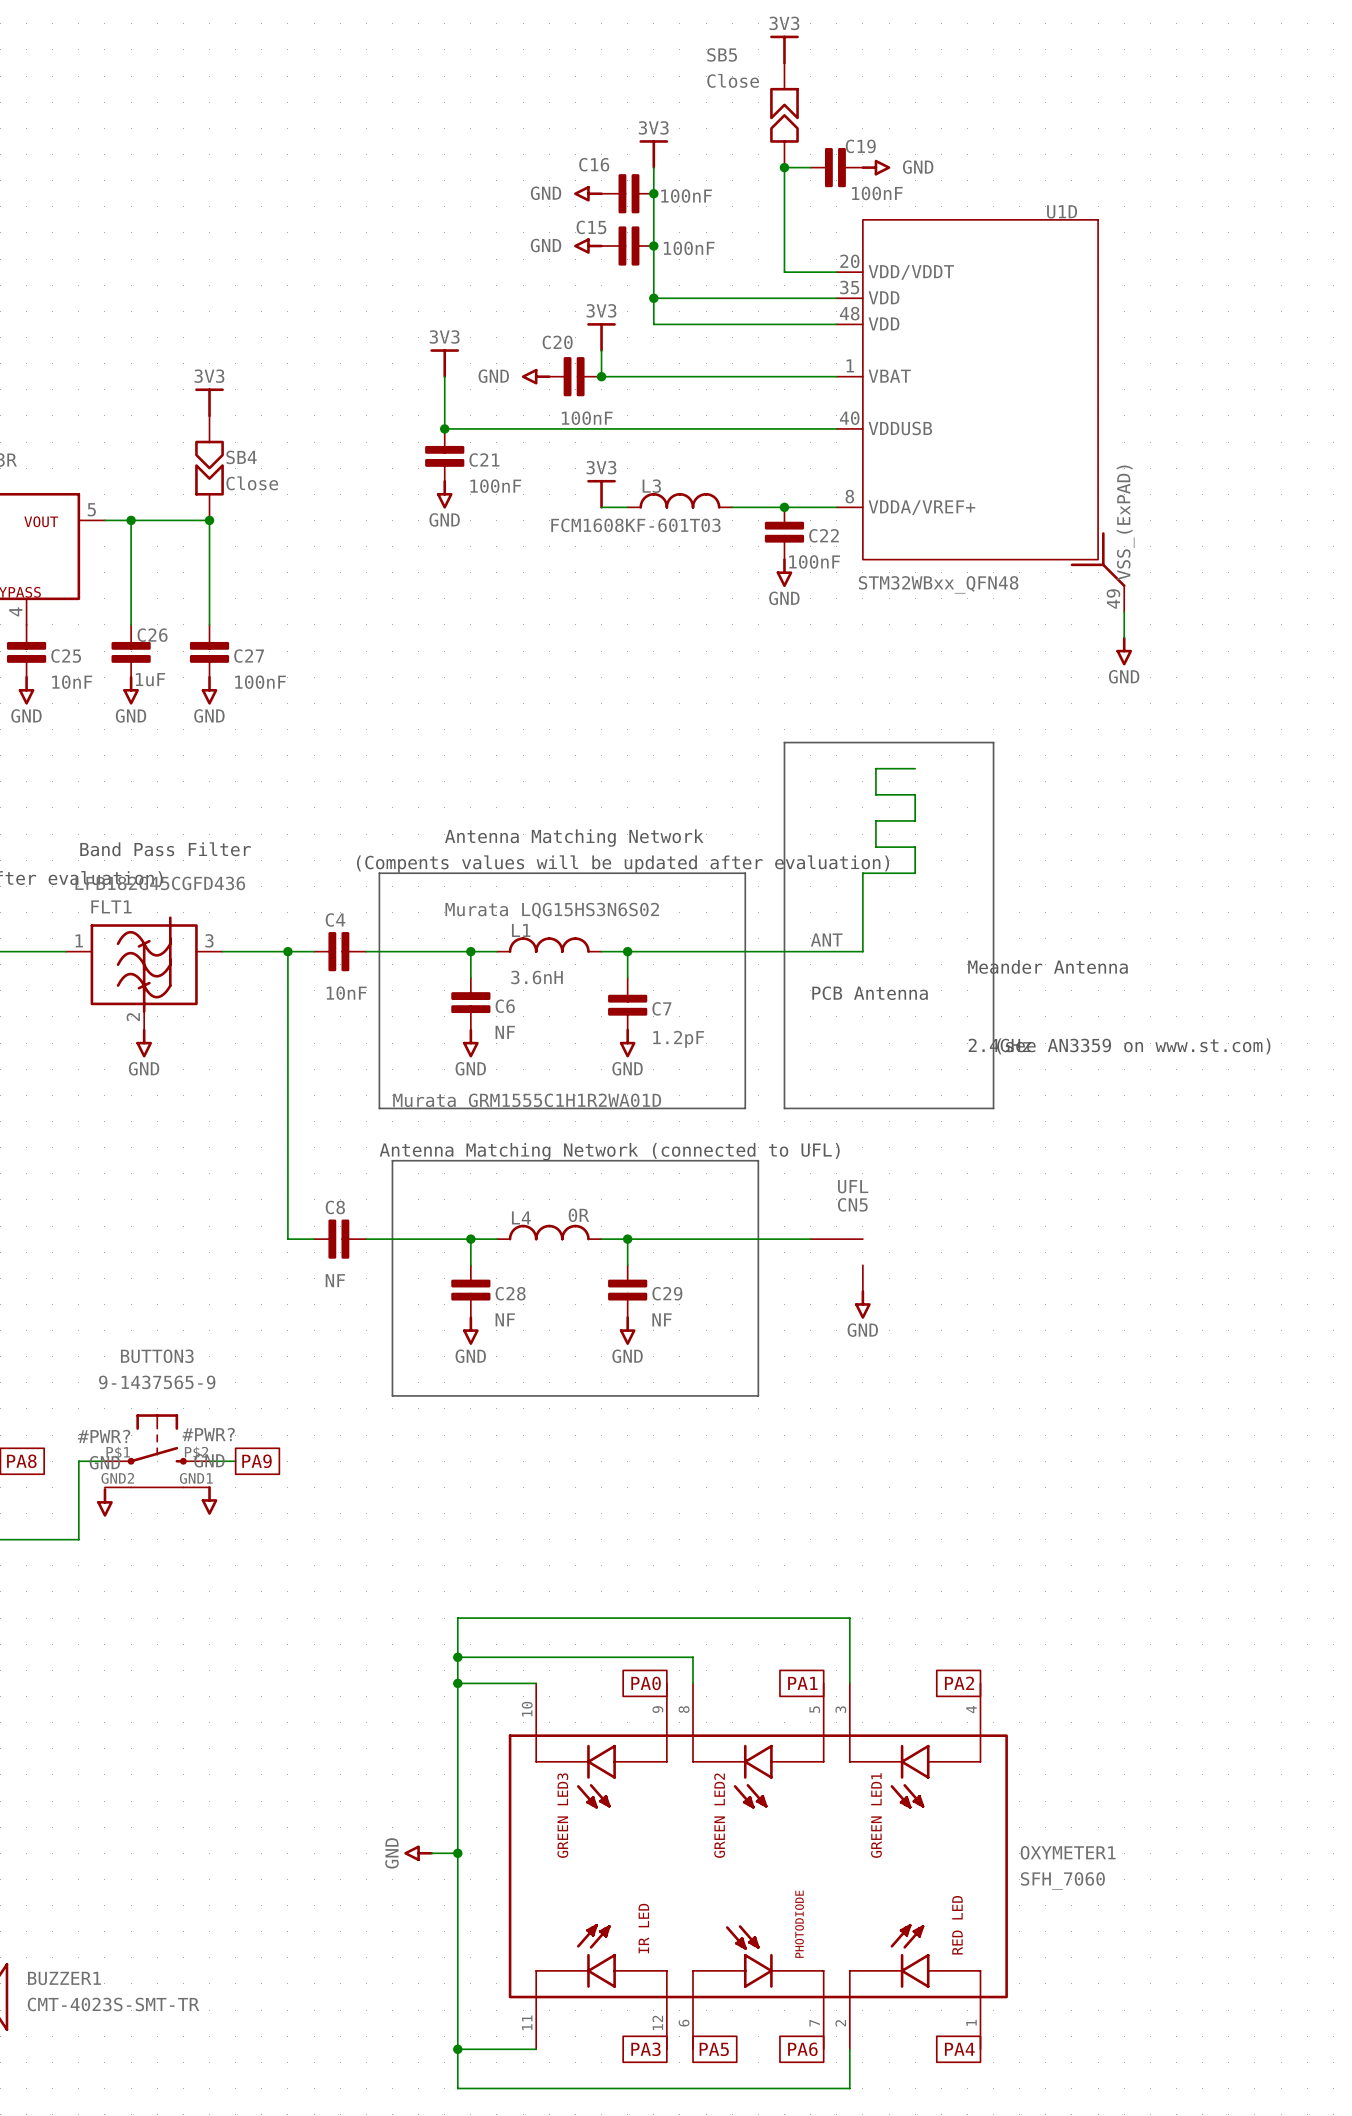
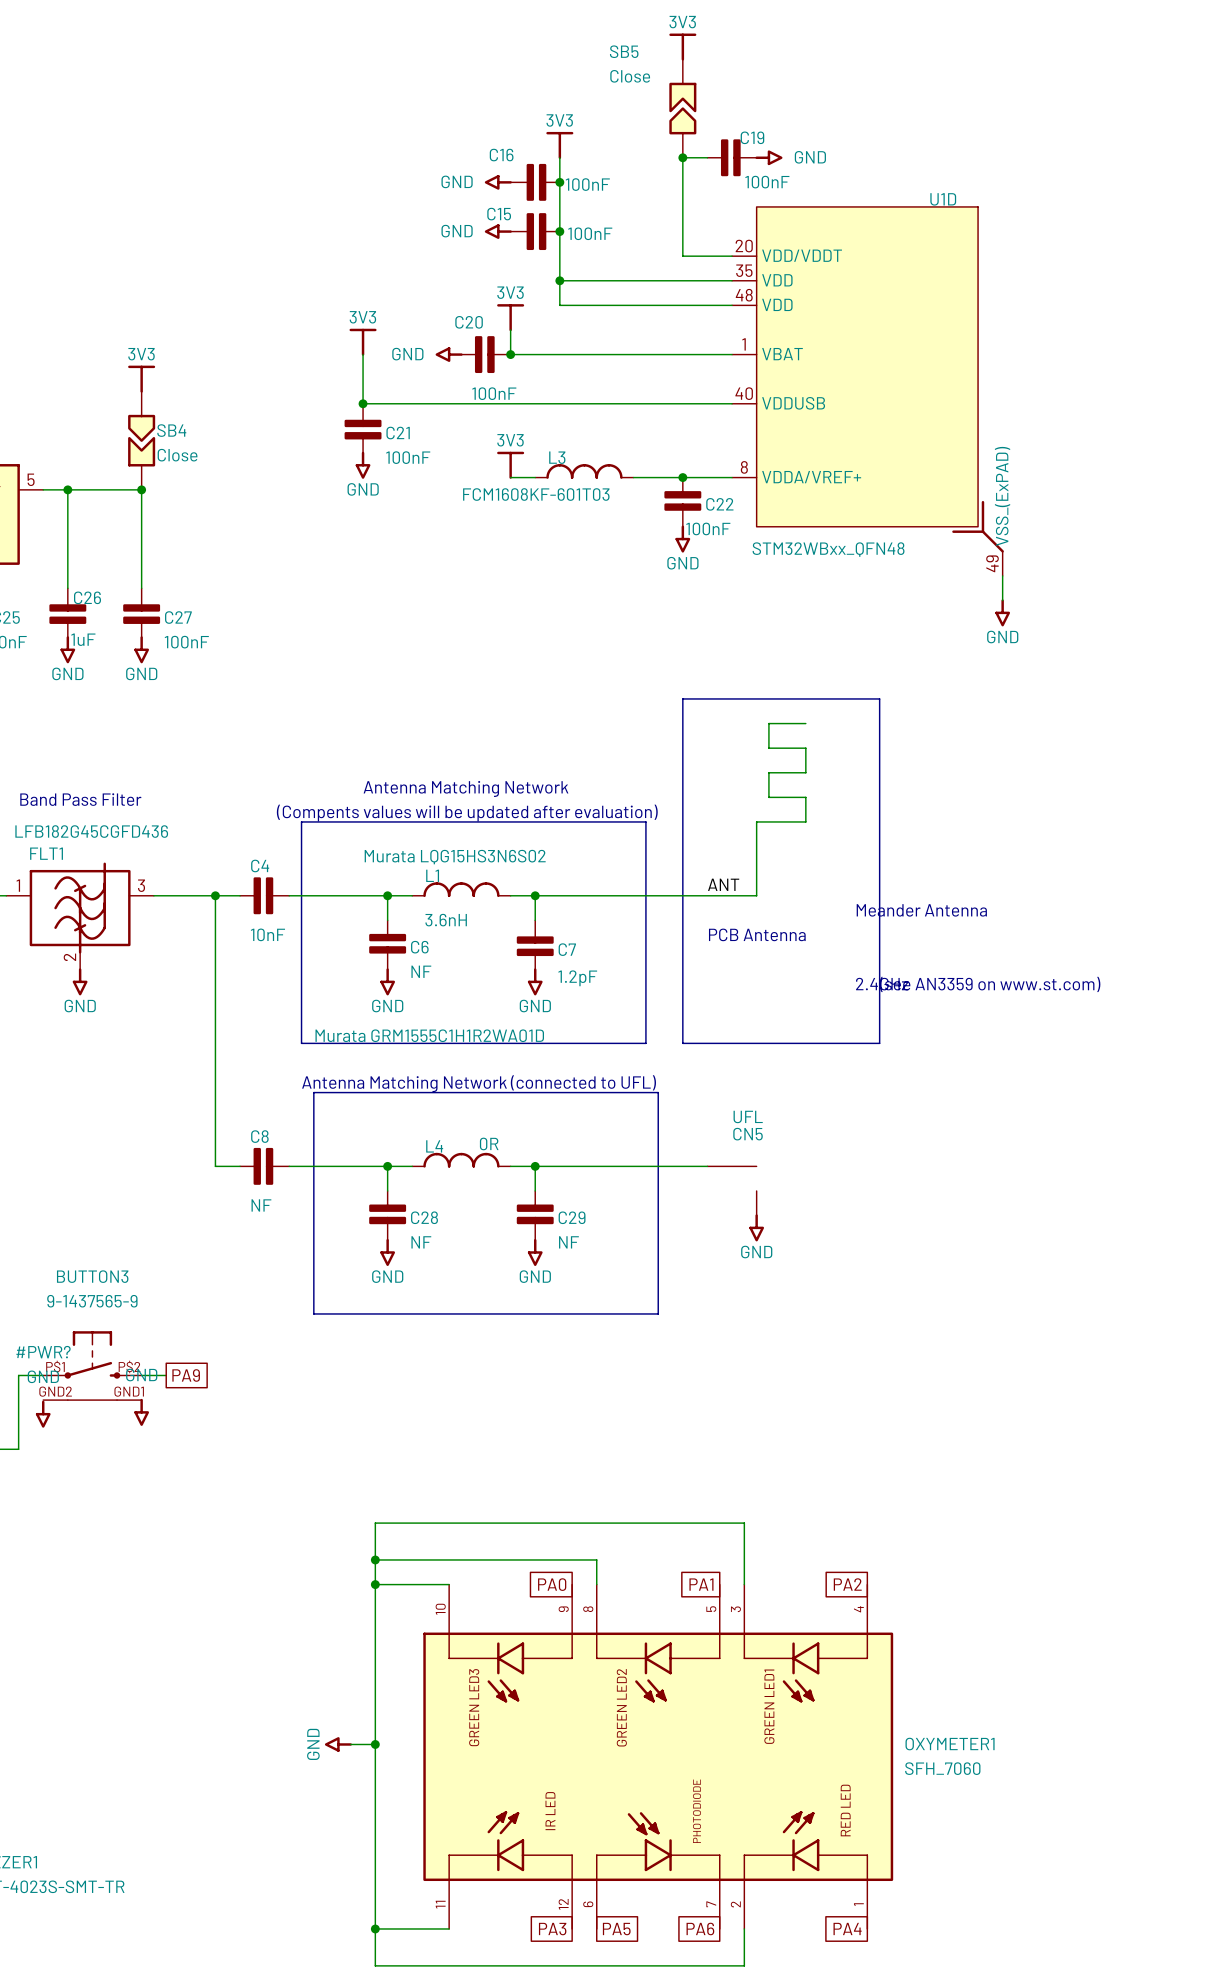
#PWR? name: #PWR? (208, 1434) -> none

